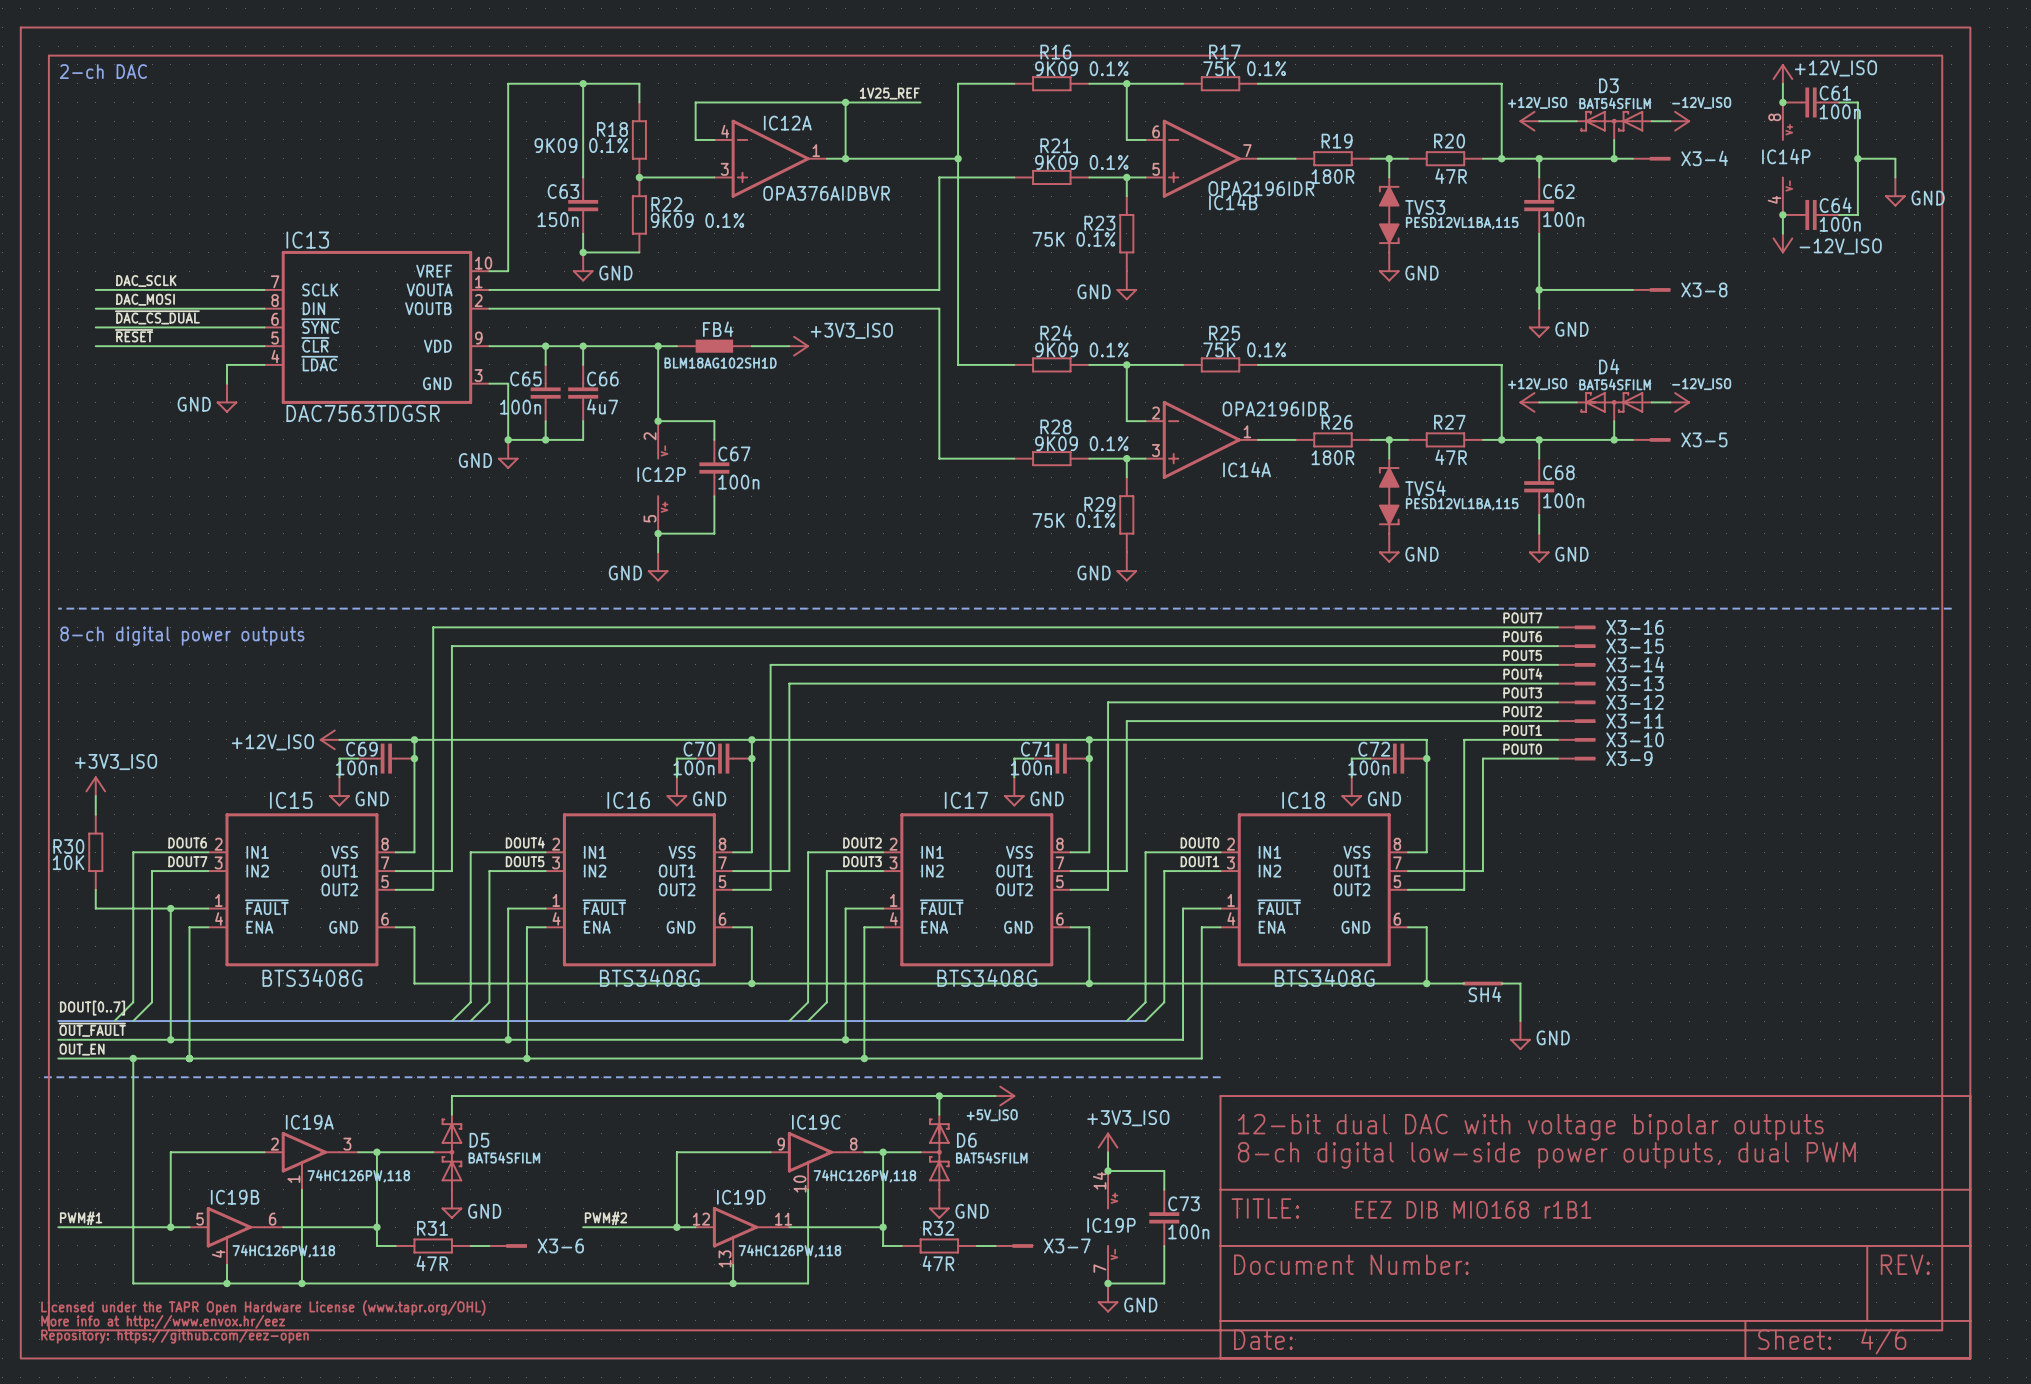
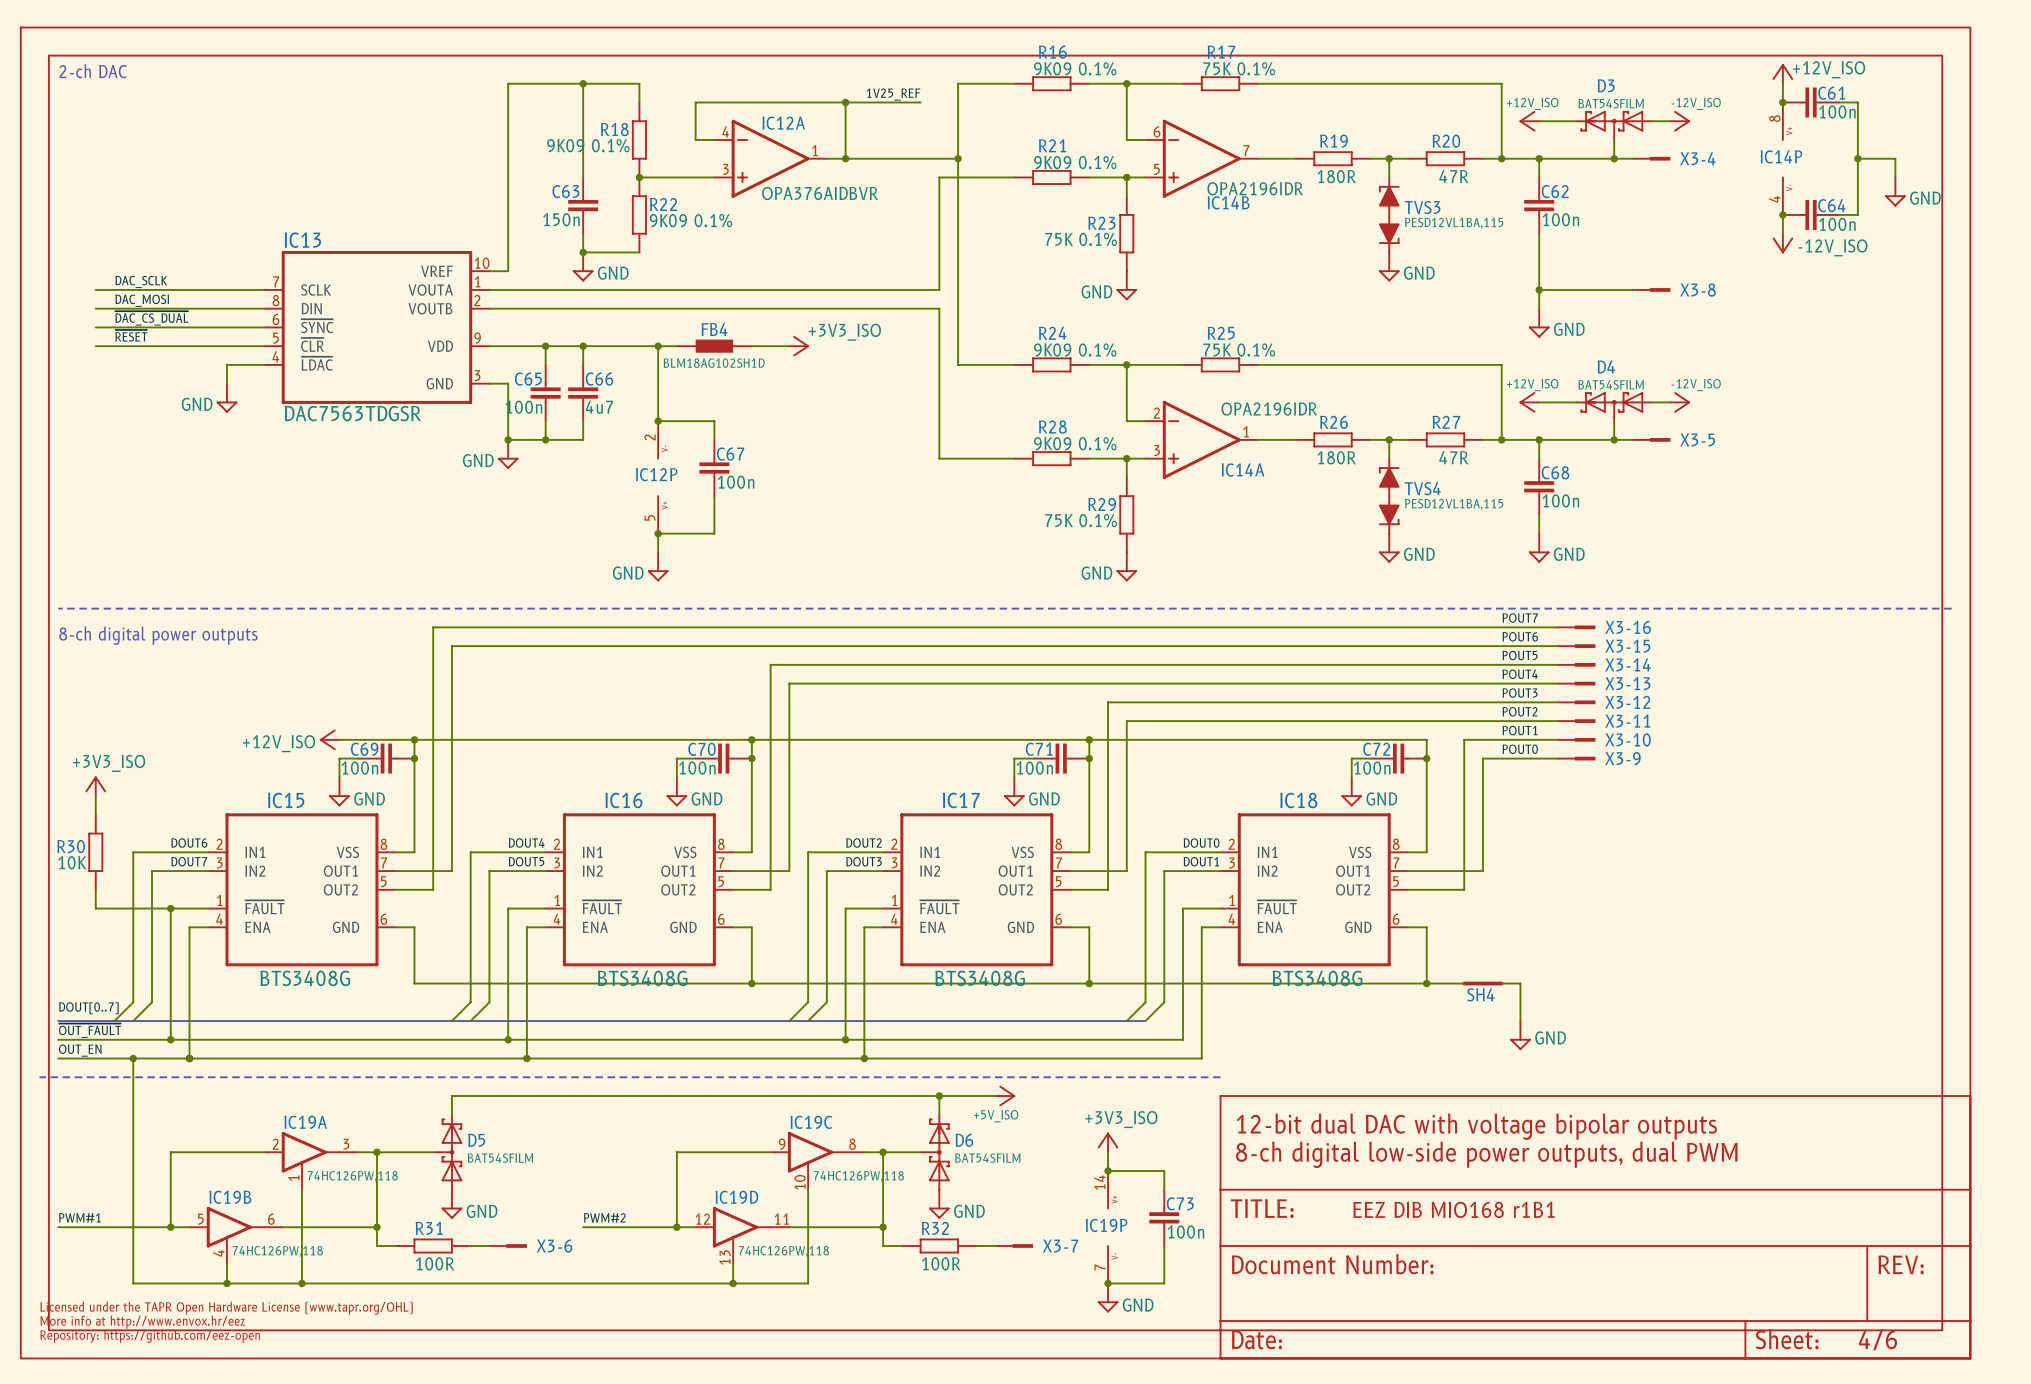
R31 value: 47R (432, 1263) -> 100R (435, 1263)
R32 value: 47R (938, 1263) -> 100R (941, 1263)

